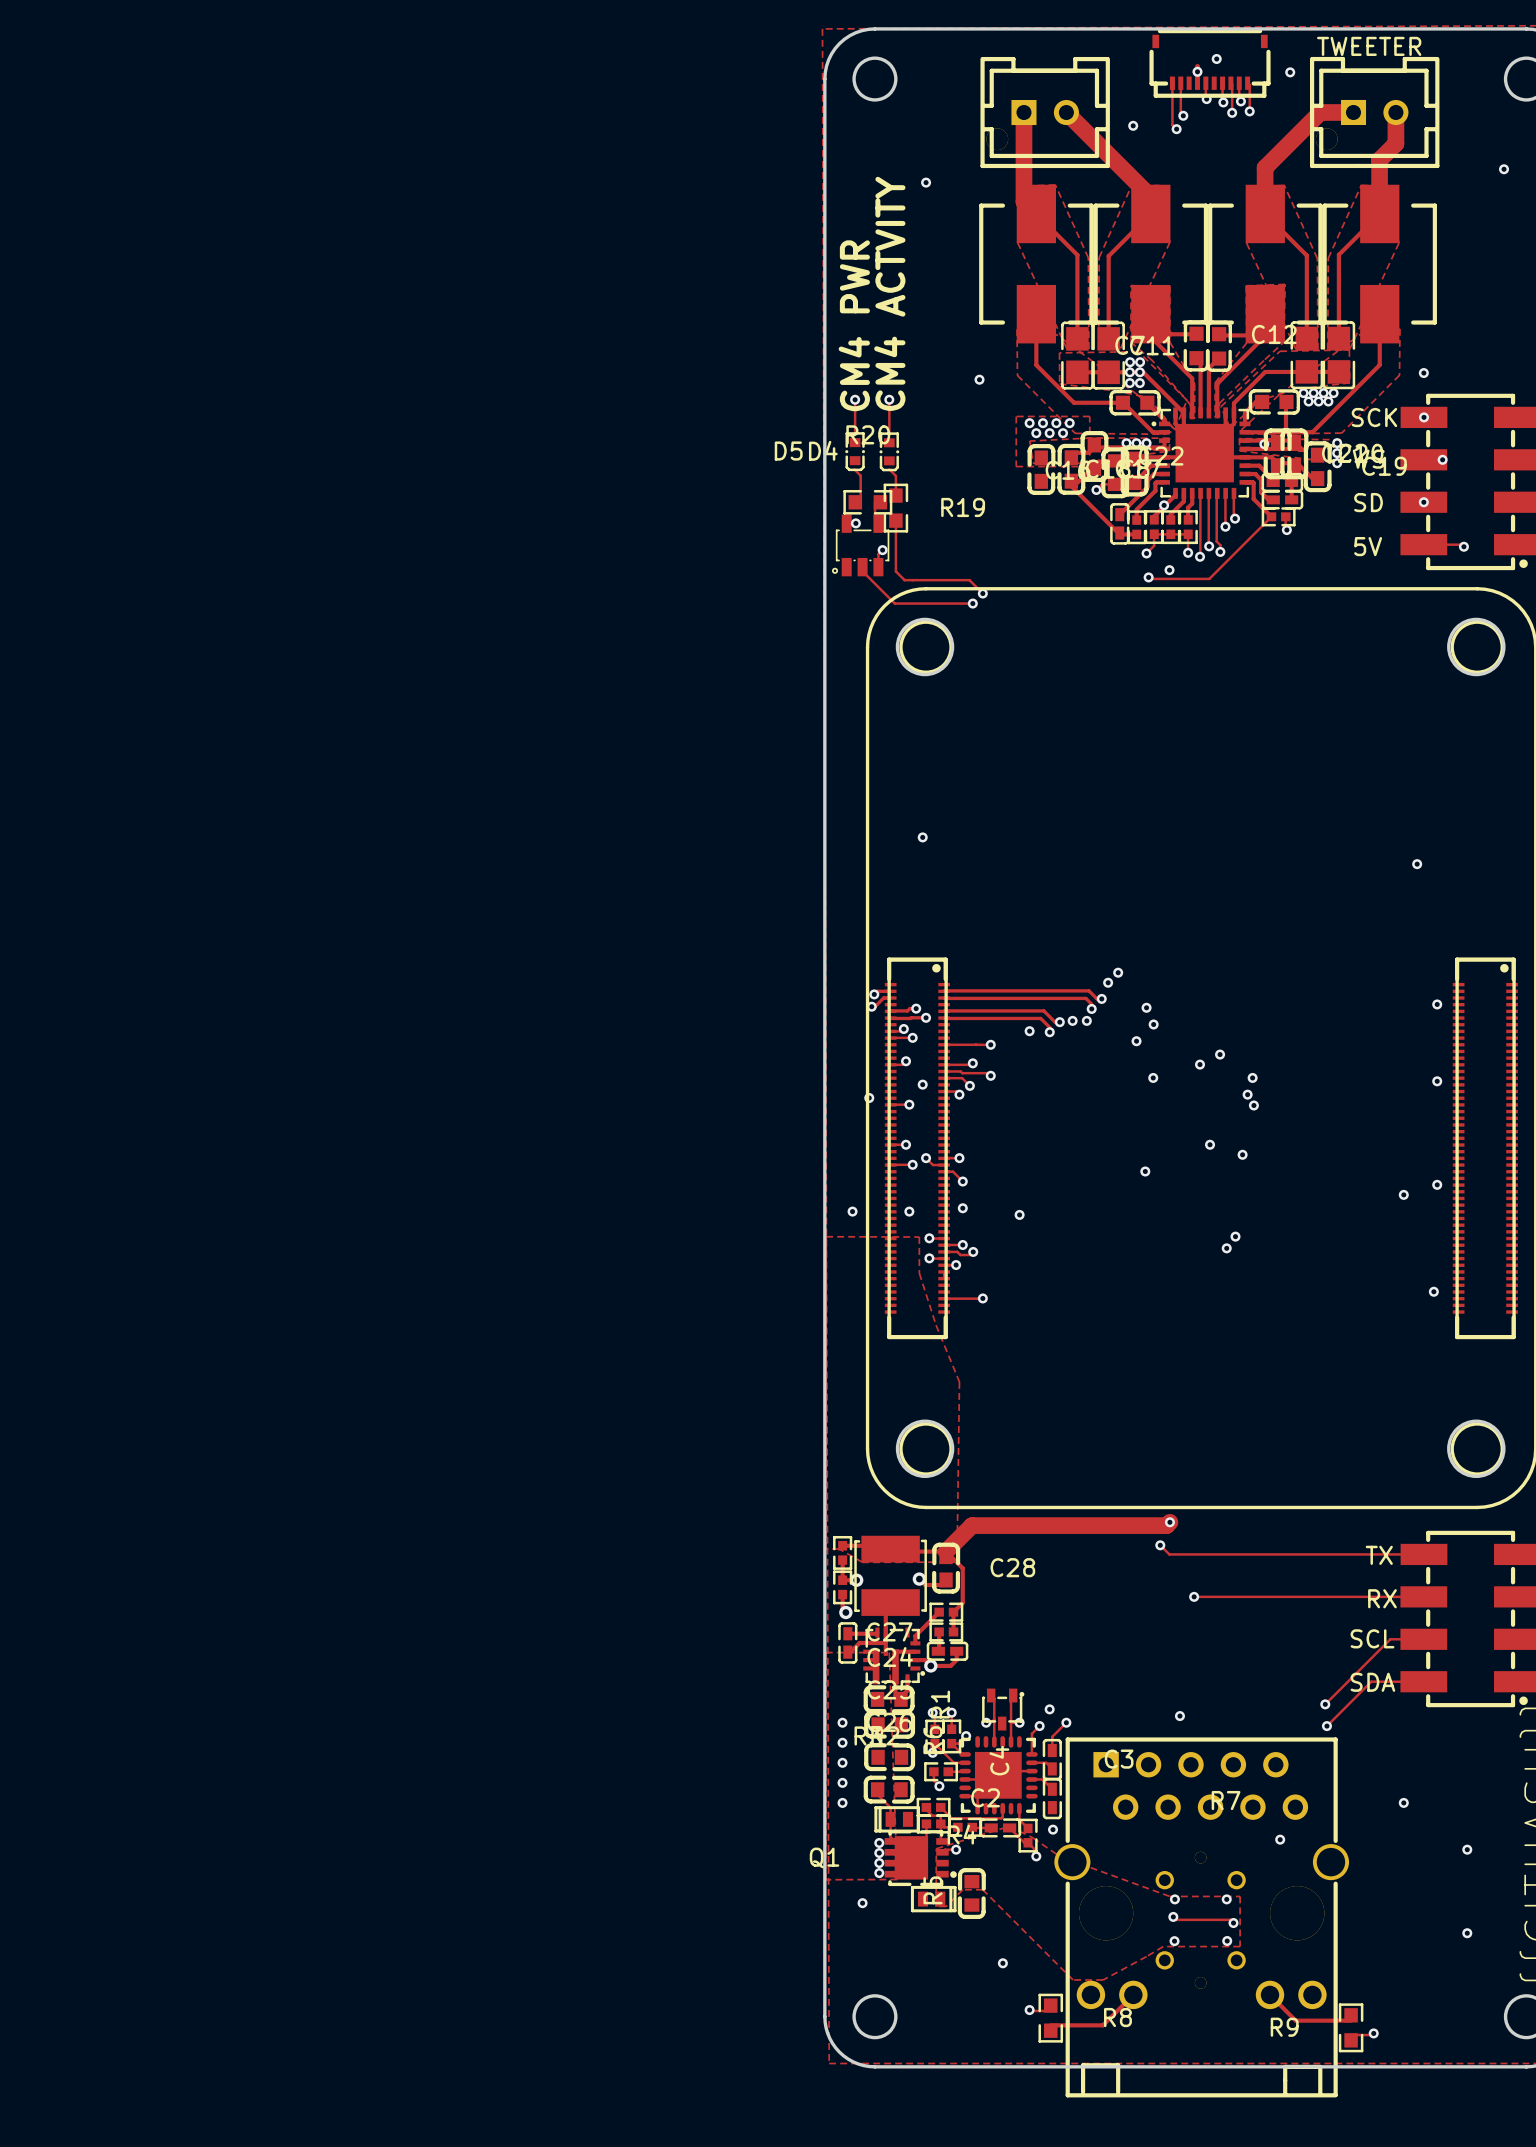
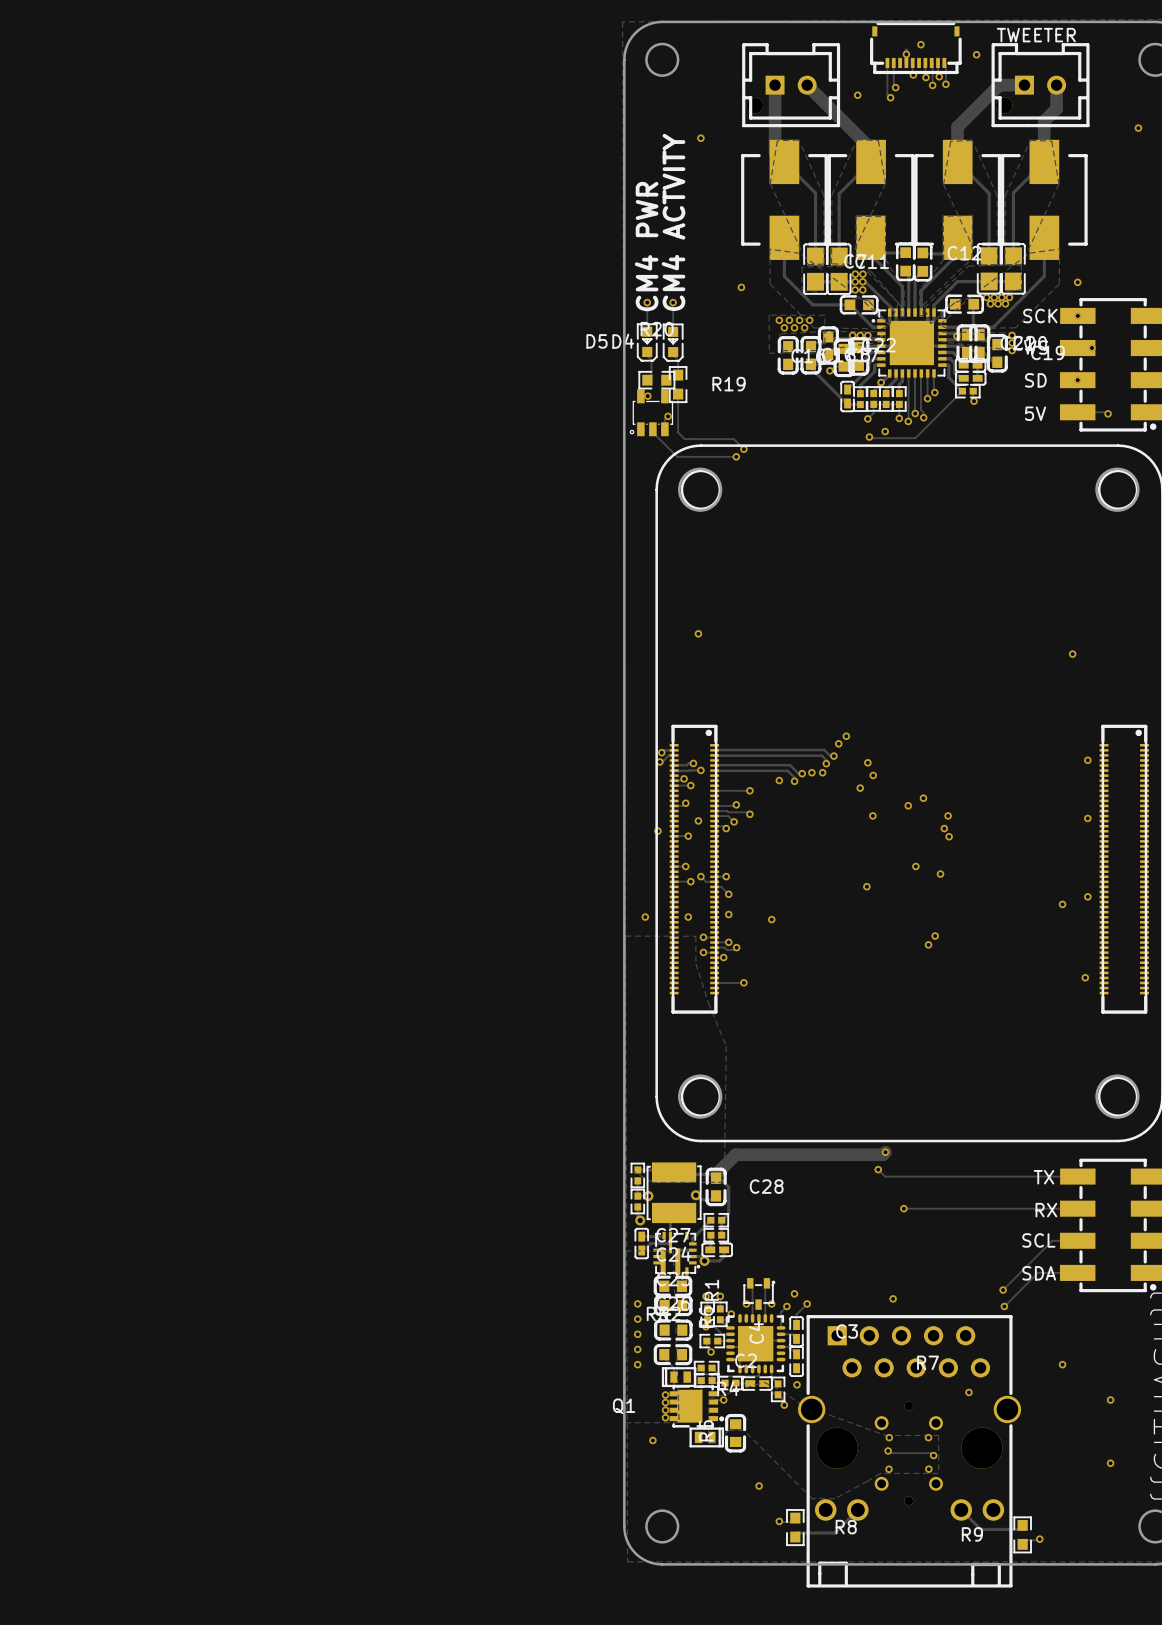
D5 footprint: [845, 432, 865, 472] -> [636, 323, 658, 362]
D4 footprint: [879, 432, 900, 472] -> [662, 323, 684, 362]

